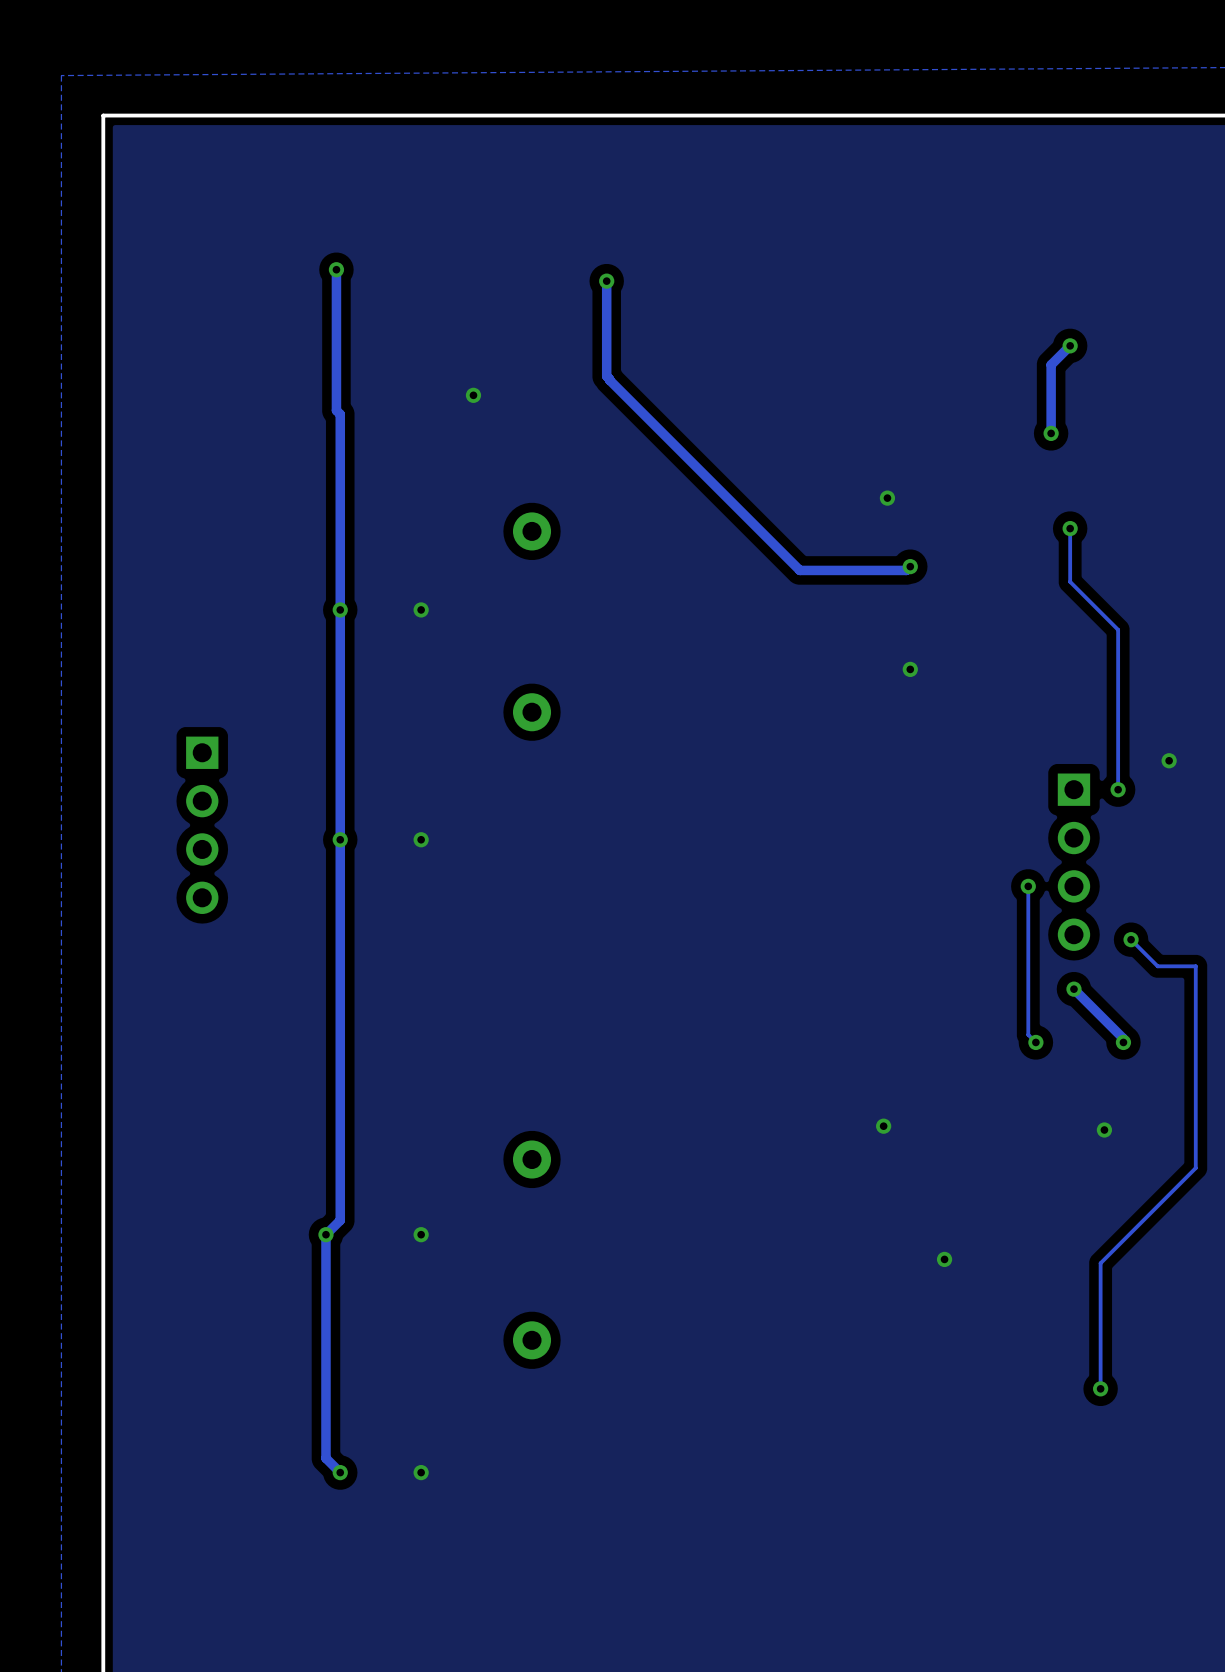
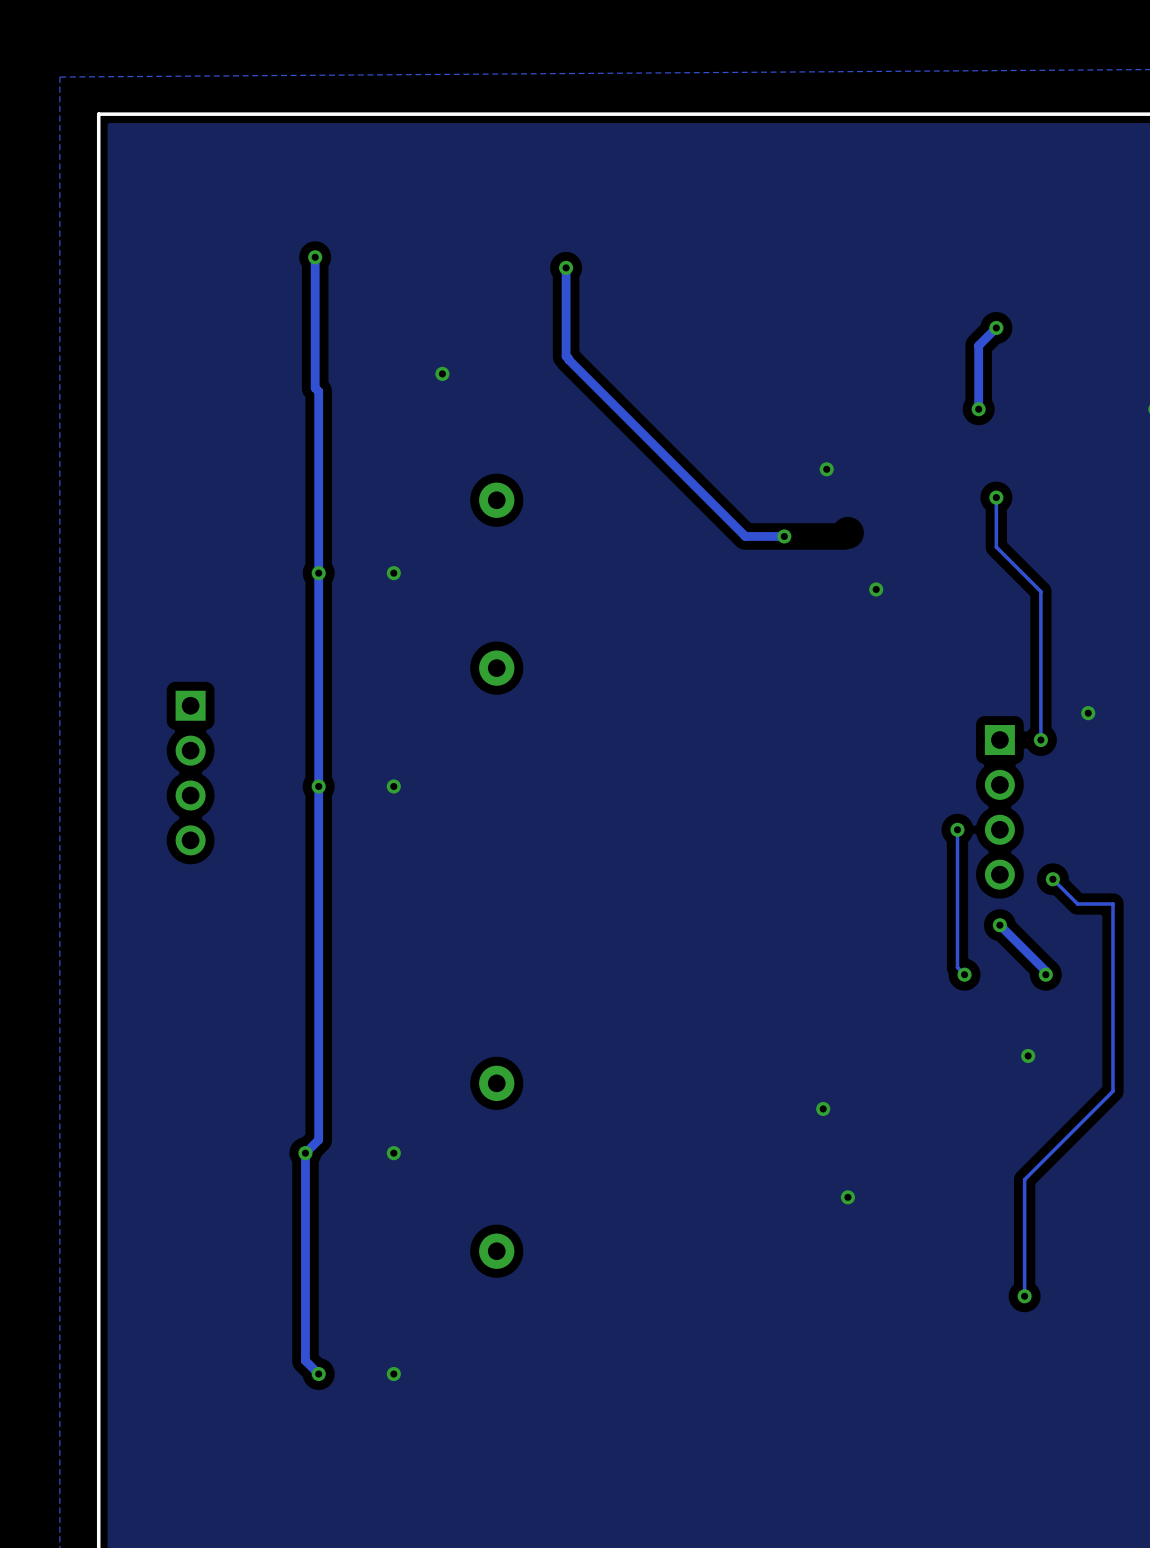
track: (910, 566) (906, 570) (841, 570) -> none
via: (910, 566) -> none
via: none -> (784, 536)
via: none -> (876, 589)
via: (910, 669) -> none
via: (883, 1126) -> none
via: none -> (823, 1108)
via position: (944, 1259) -> (847, 1197)

